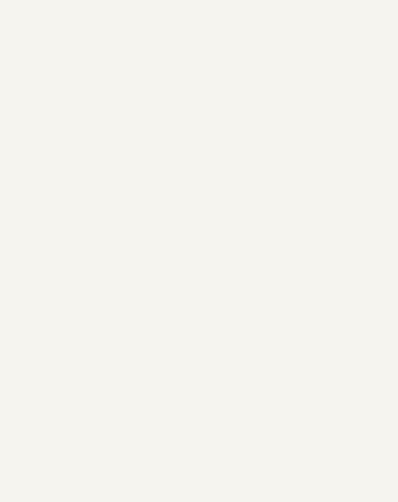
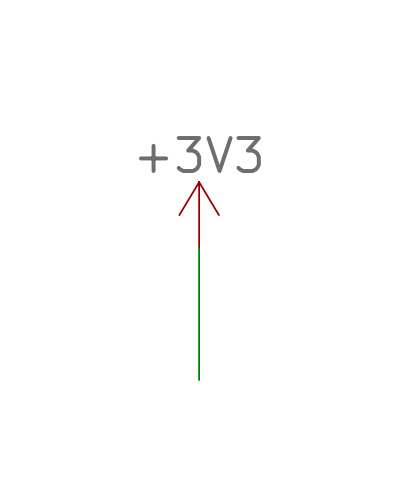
power symbol: none -> +3V3 (199, 215)
wire: none -> (199, 248) (199, 380)

